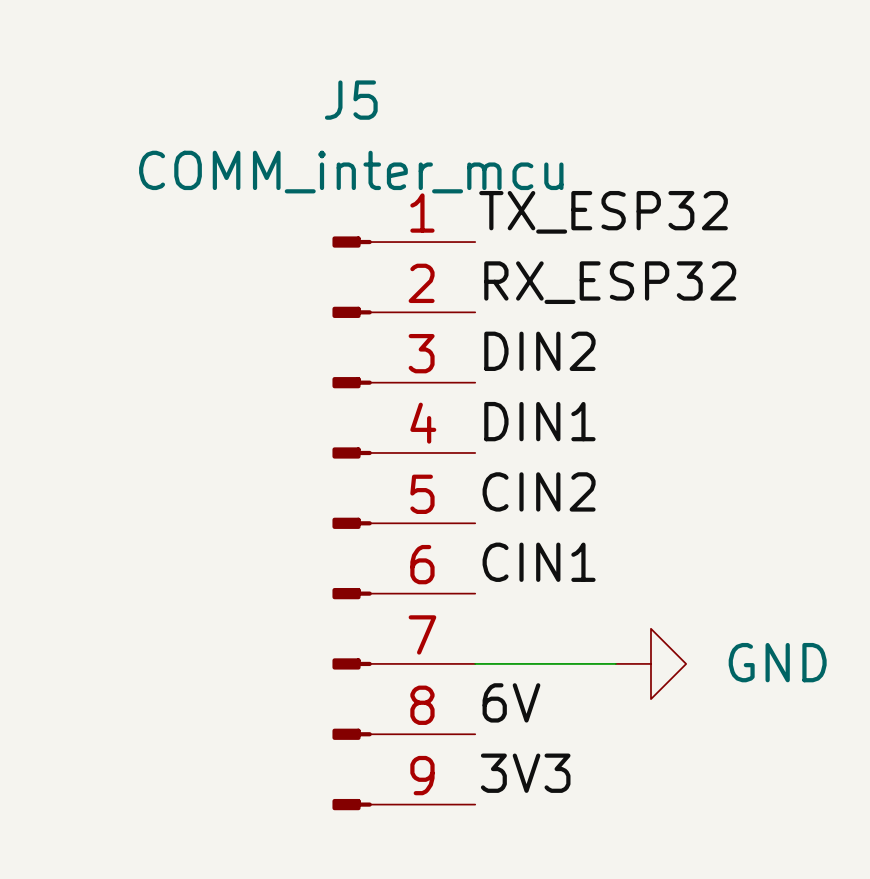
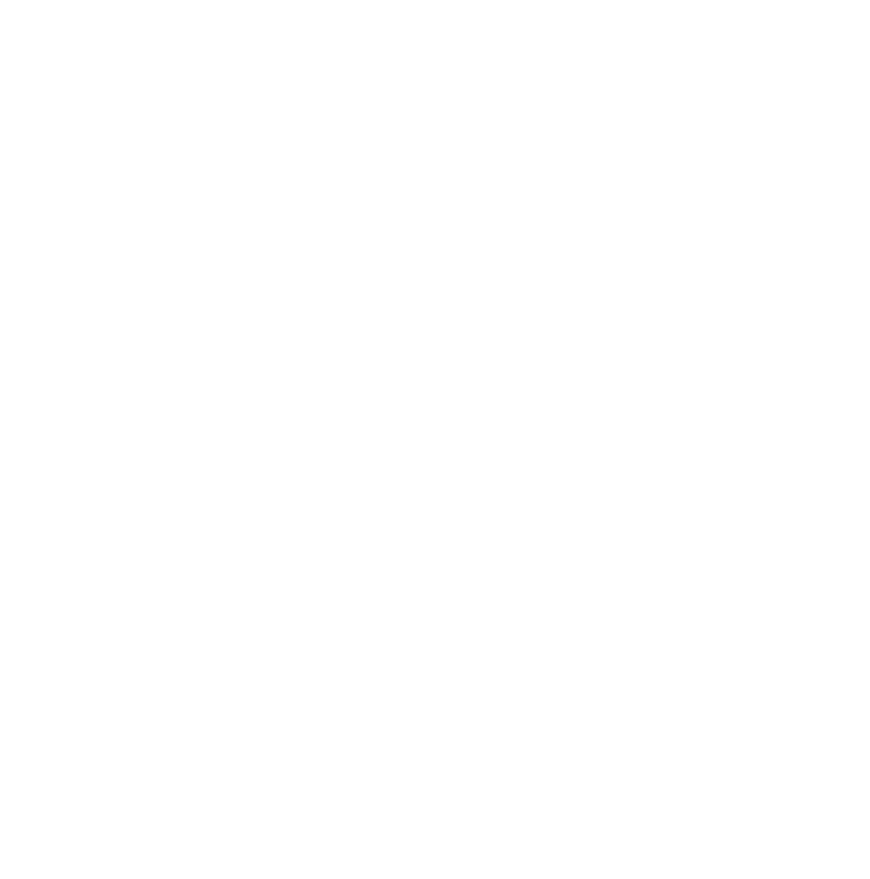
label: TX_ESP32 (603, 212) -> none
label: RX_ESP32 (610, 282) -> none
label: DIN2 (539, 351) -> none
label: DIN1 (539, 421) -> none
label: CIN2 (539, 491) -> none
J5: COMM_inter_mcu (403, 523) -> none
label: CIN1 (539, 562) -> none
wire: (475, 663) (615, 663) -> none
power symbol: GND (650, 663) -> none
label: 6V (511, 702) -> none
label: 3V3 (525, 773) -> none

